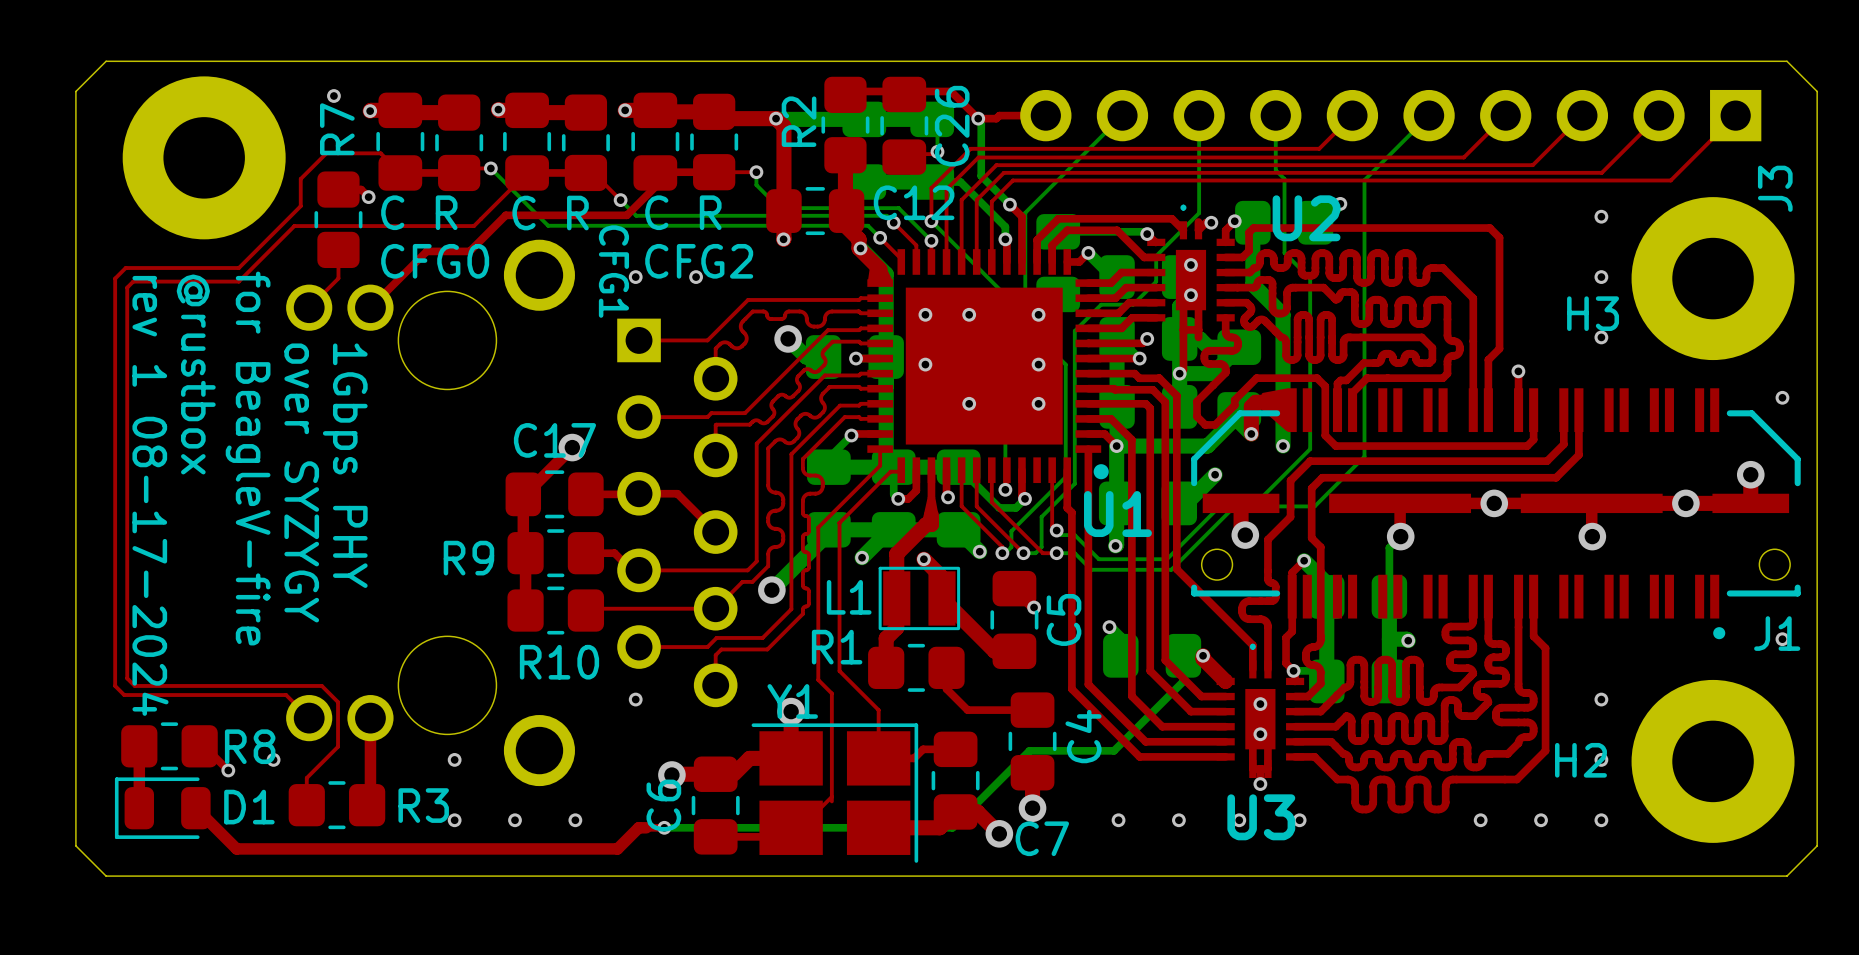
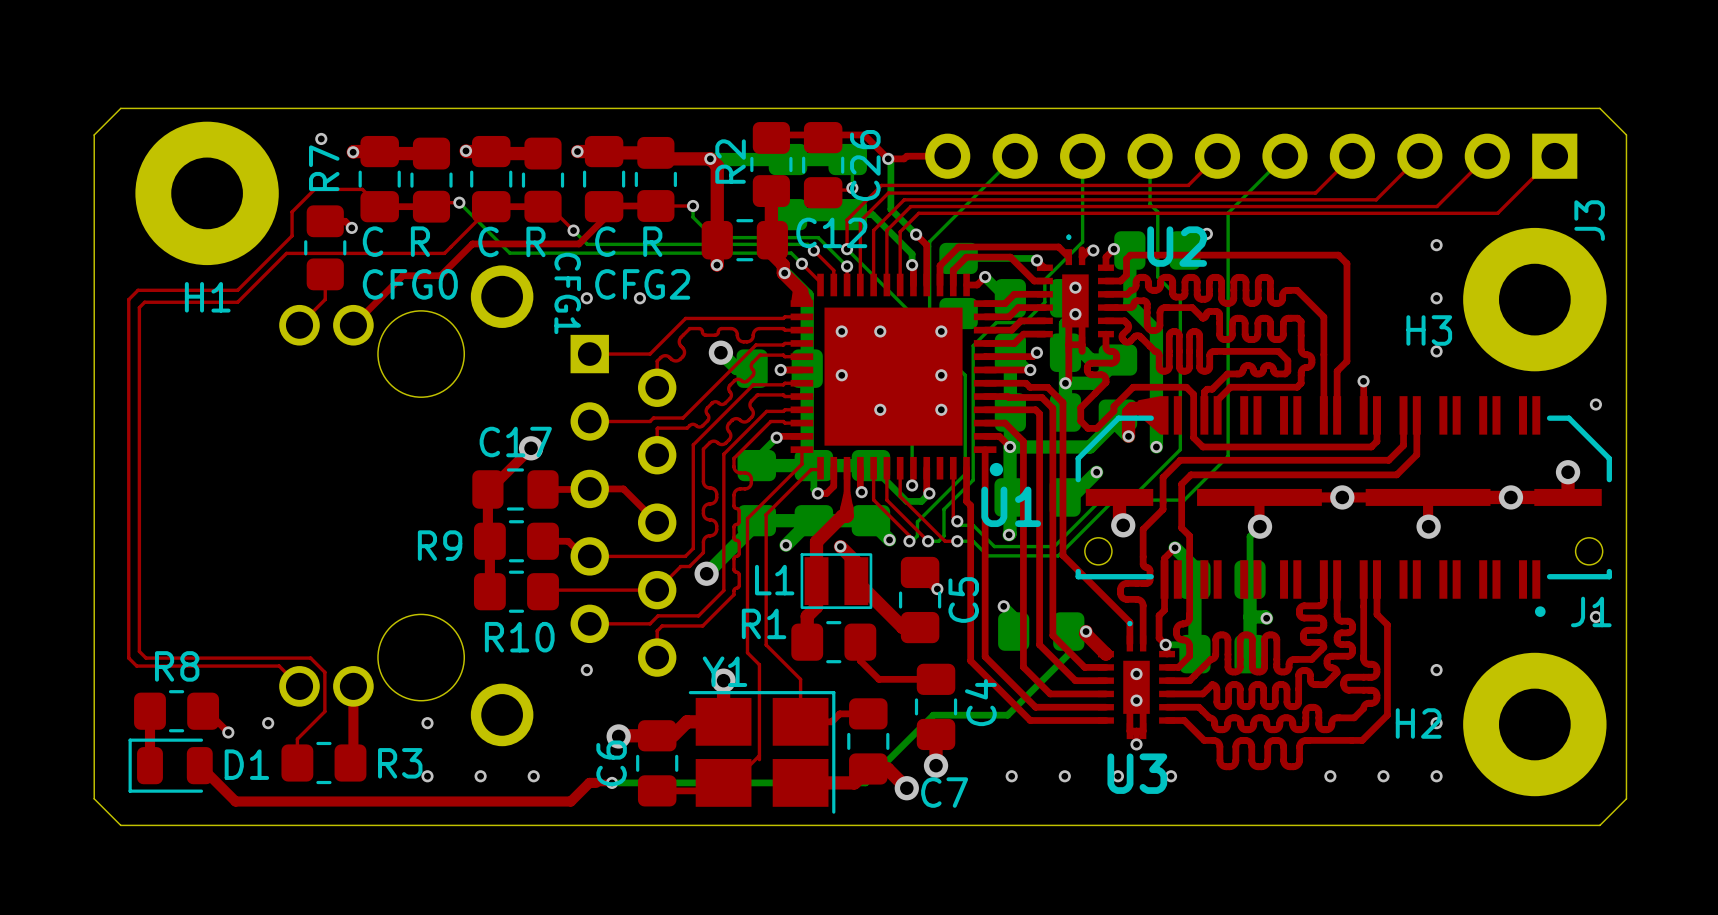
H1 name: none -> H1 (207, 297)
text: @rustbox (196, 374) -> none
text: for BeagleV-fire (248, 458) -> none
text: 1Gbps PHY (345, 465) -> none
text: over SYZYGY (301, 482) -> none
text: rev 1 08-17-2024 (150, 495) -> none
R8 name position: R8 (250, 746) -> R8 (177, 666)

